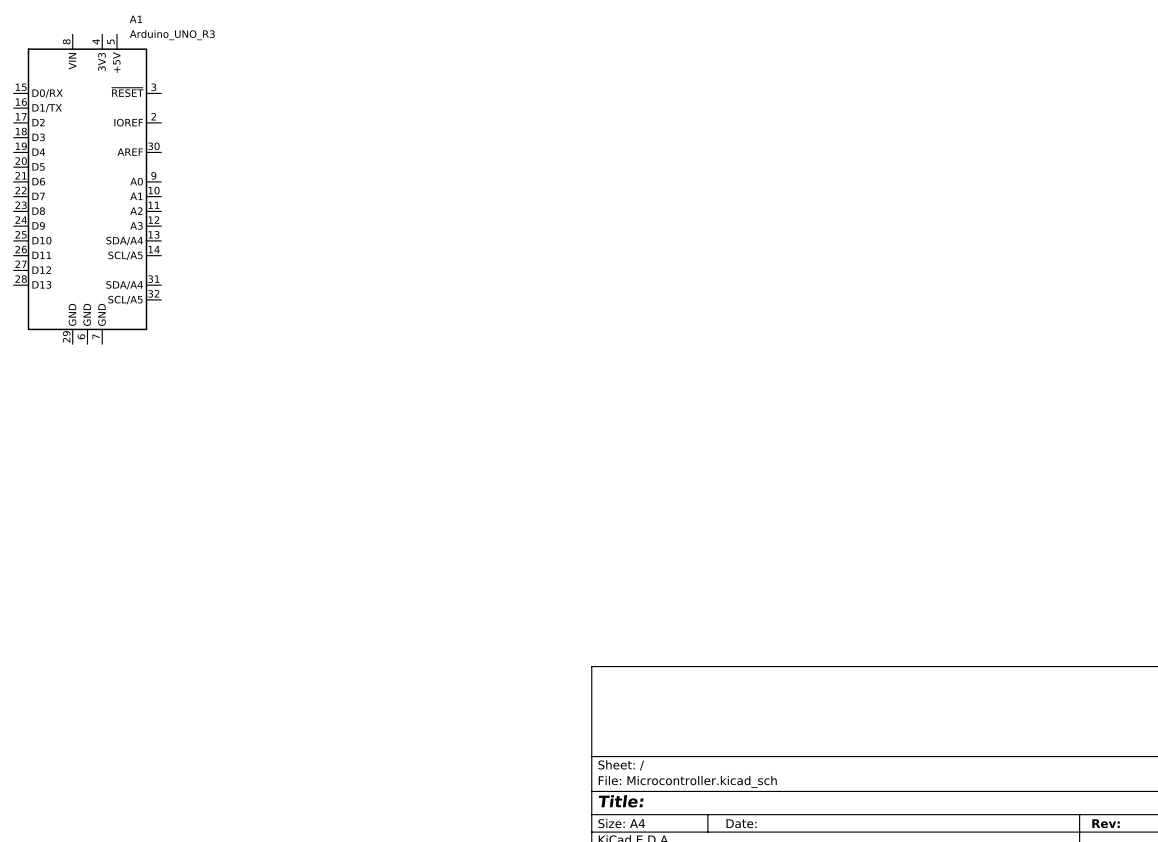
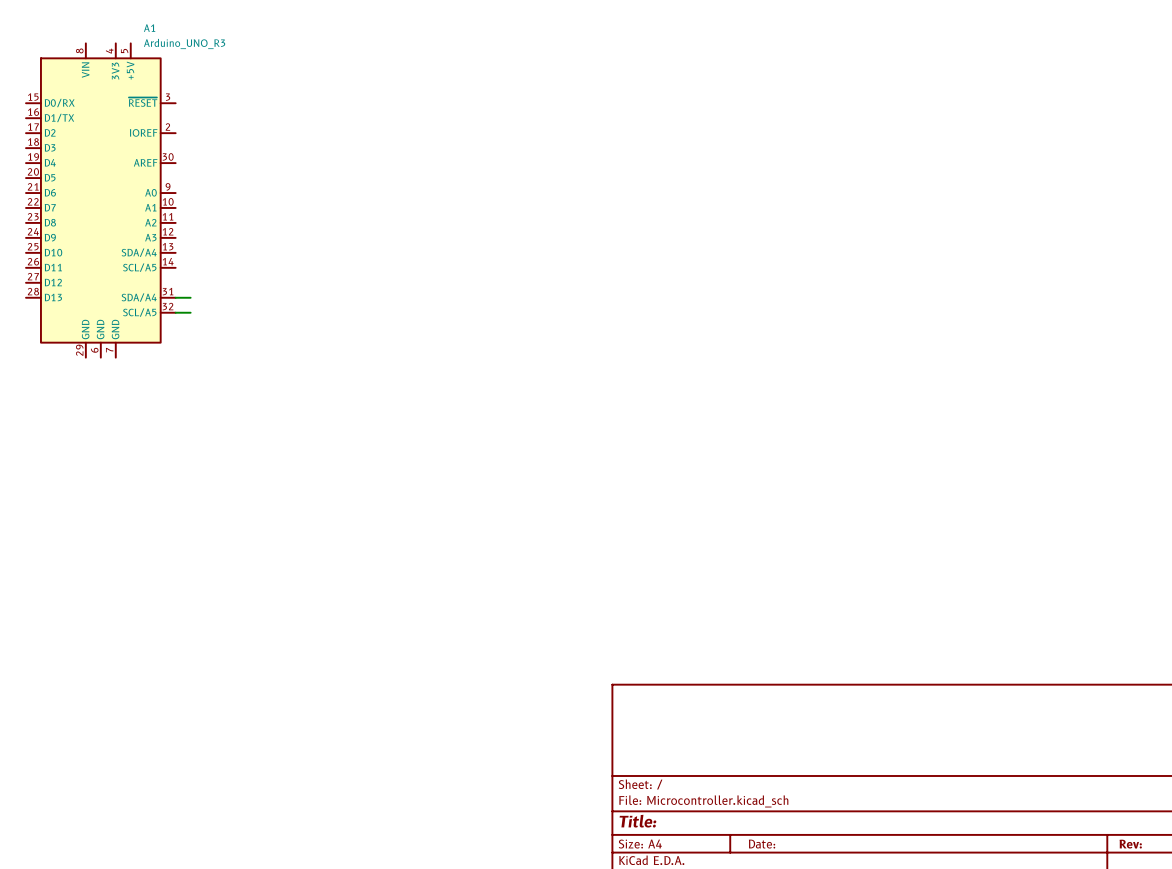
wire: none -> (175, 297) (190, 297)
wire: none -> (175, 312) (190, 312)

